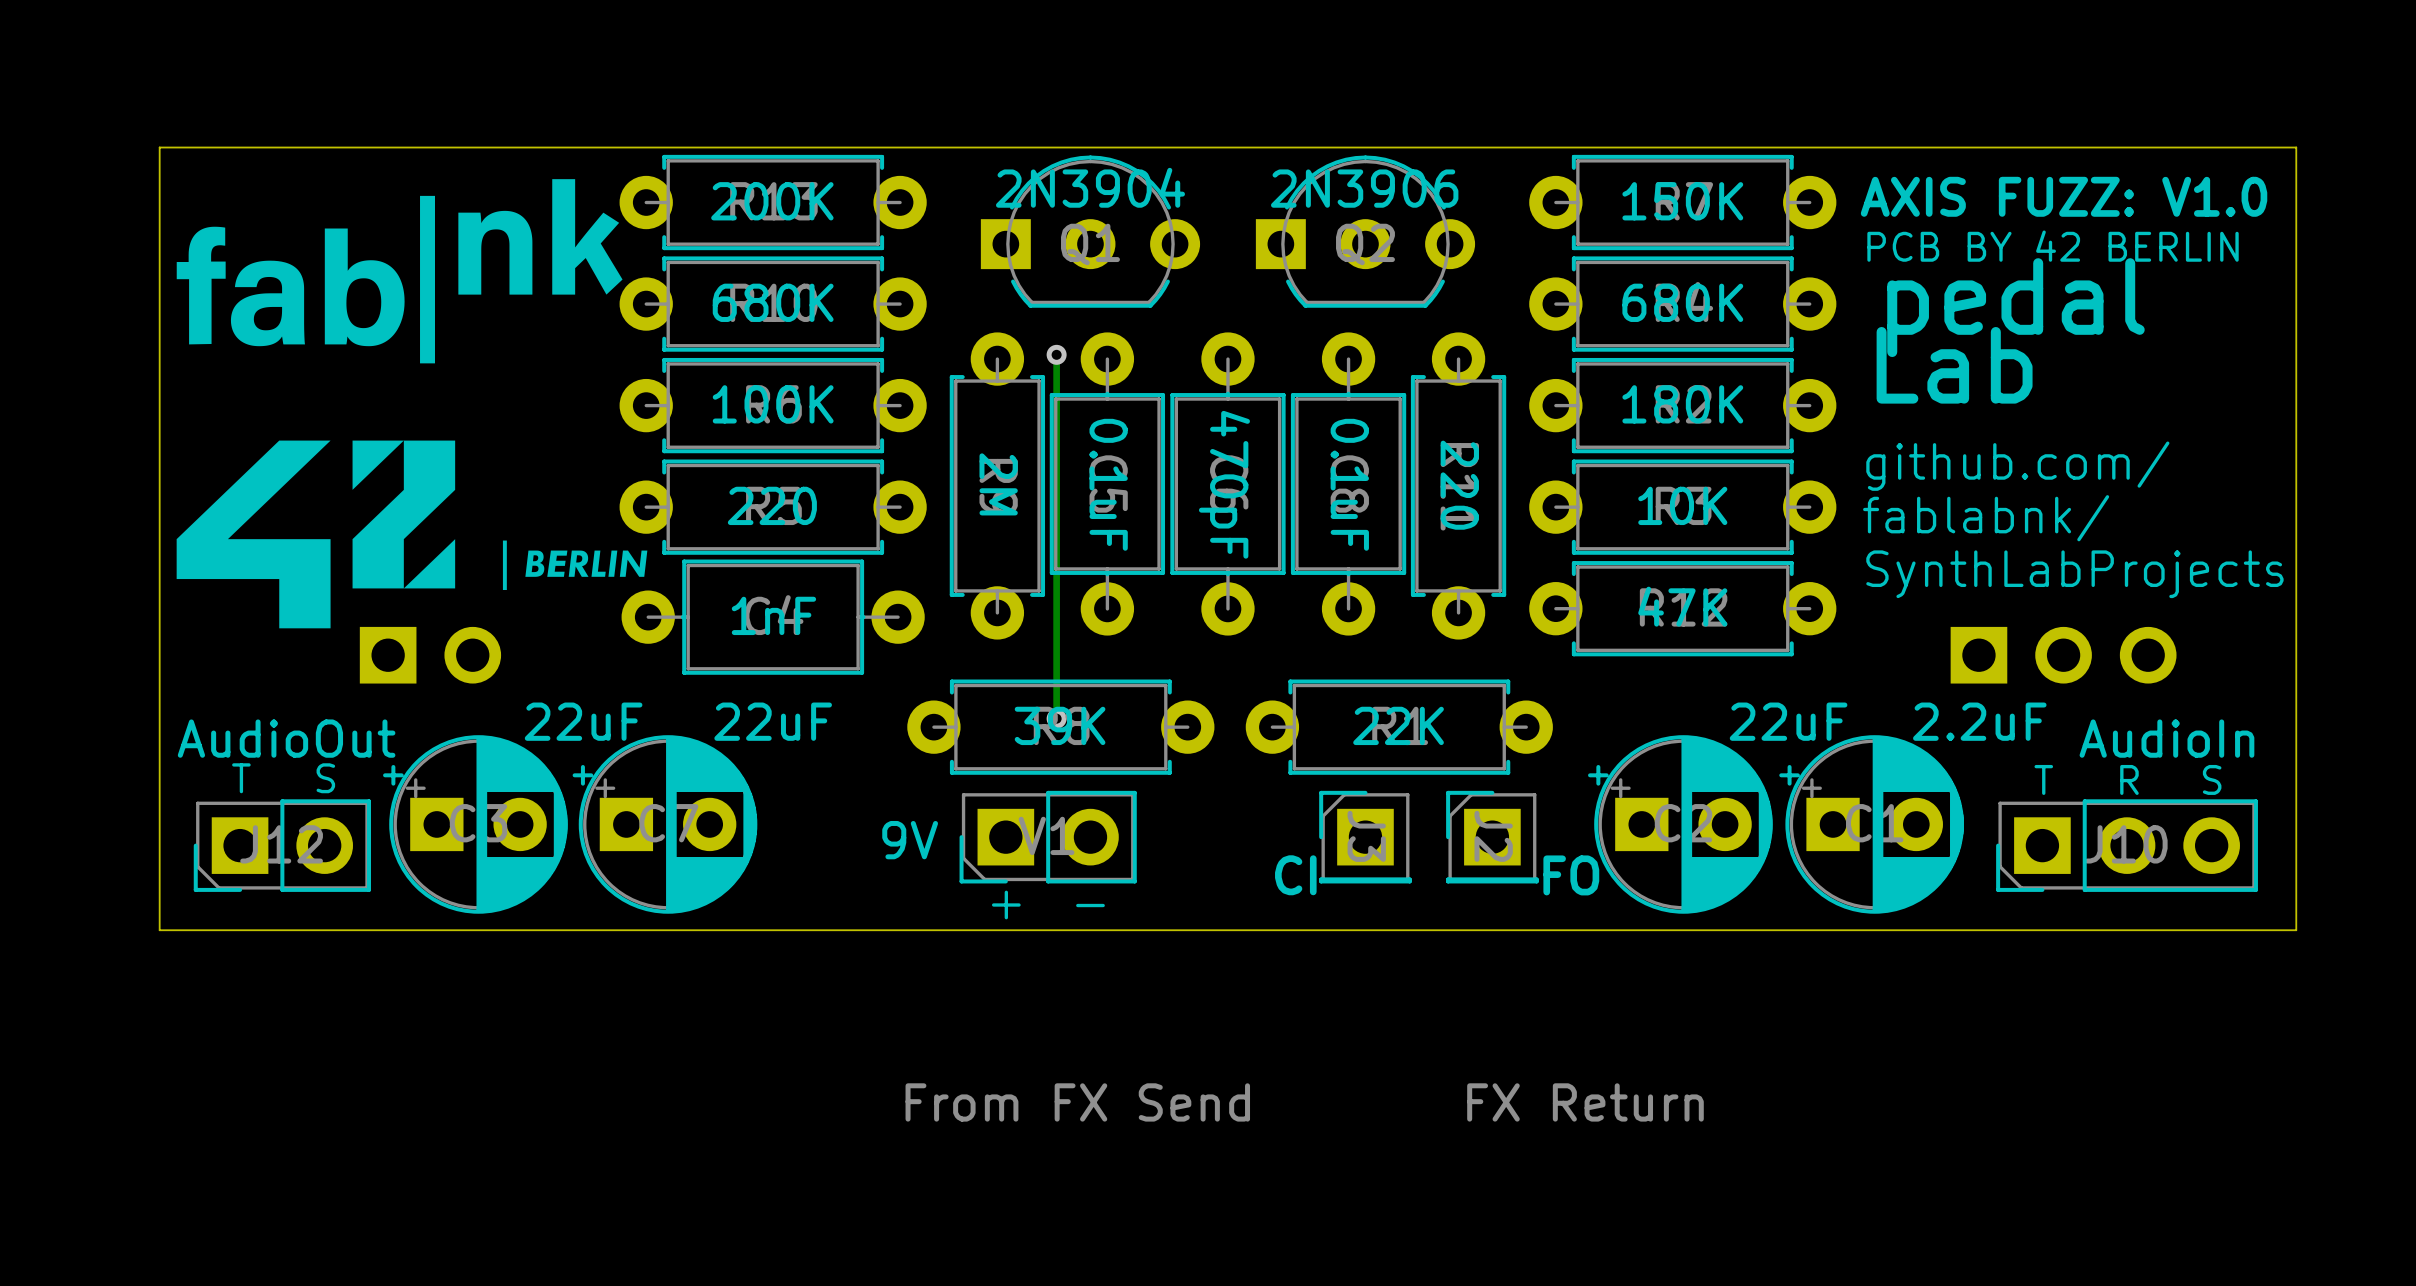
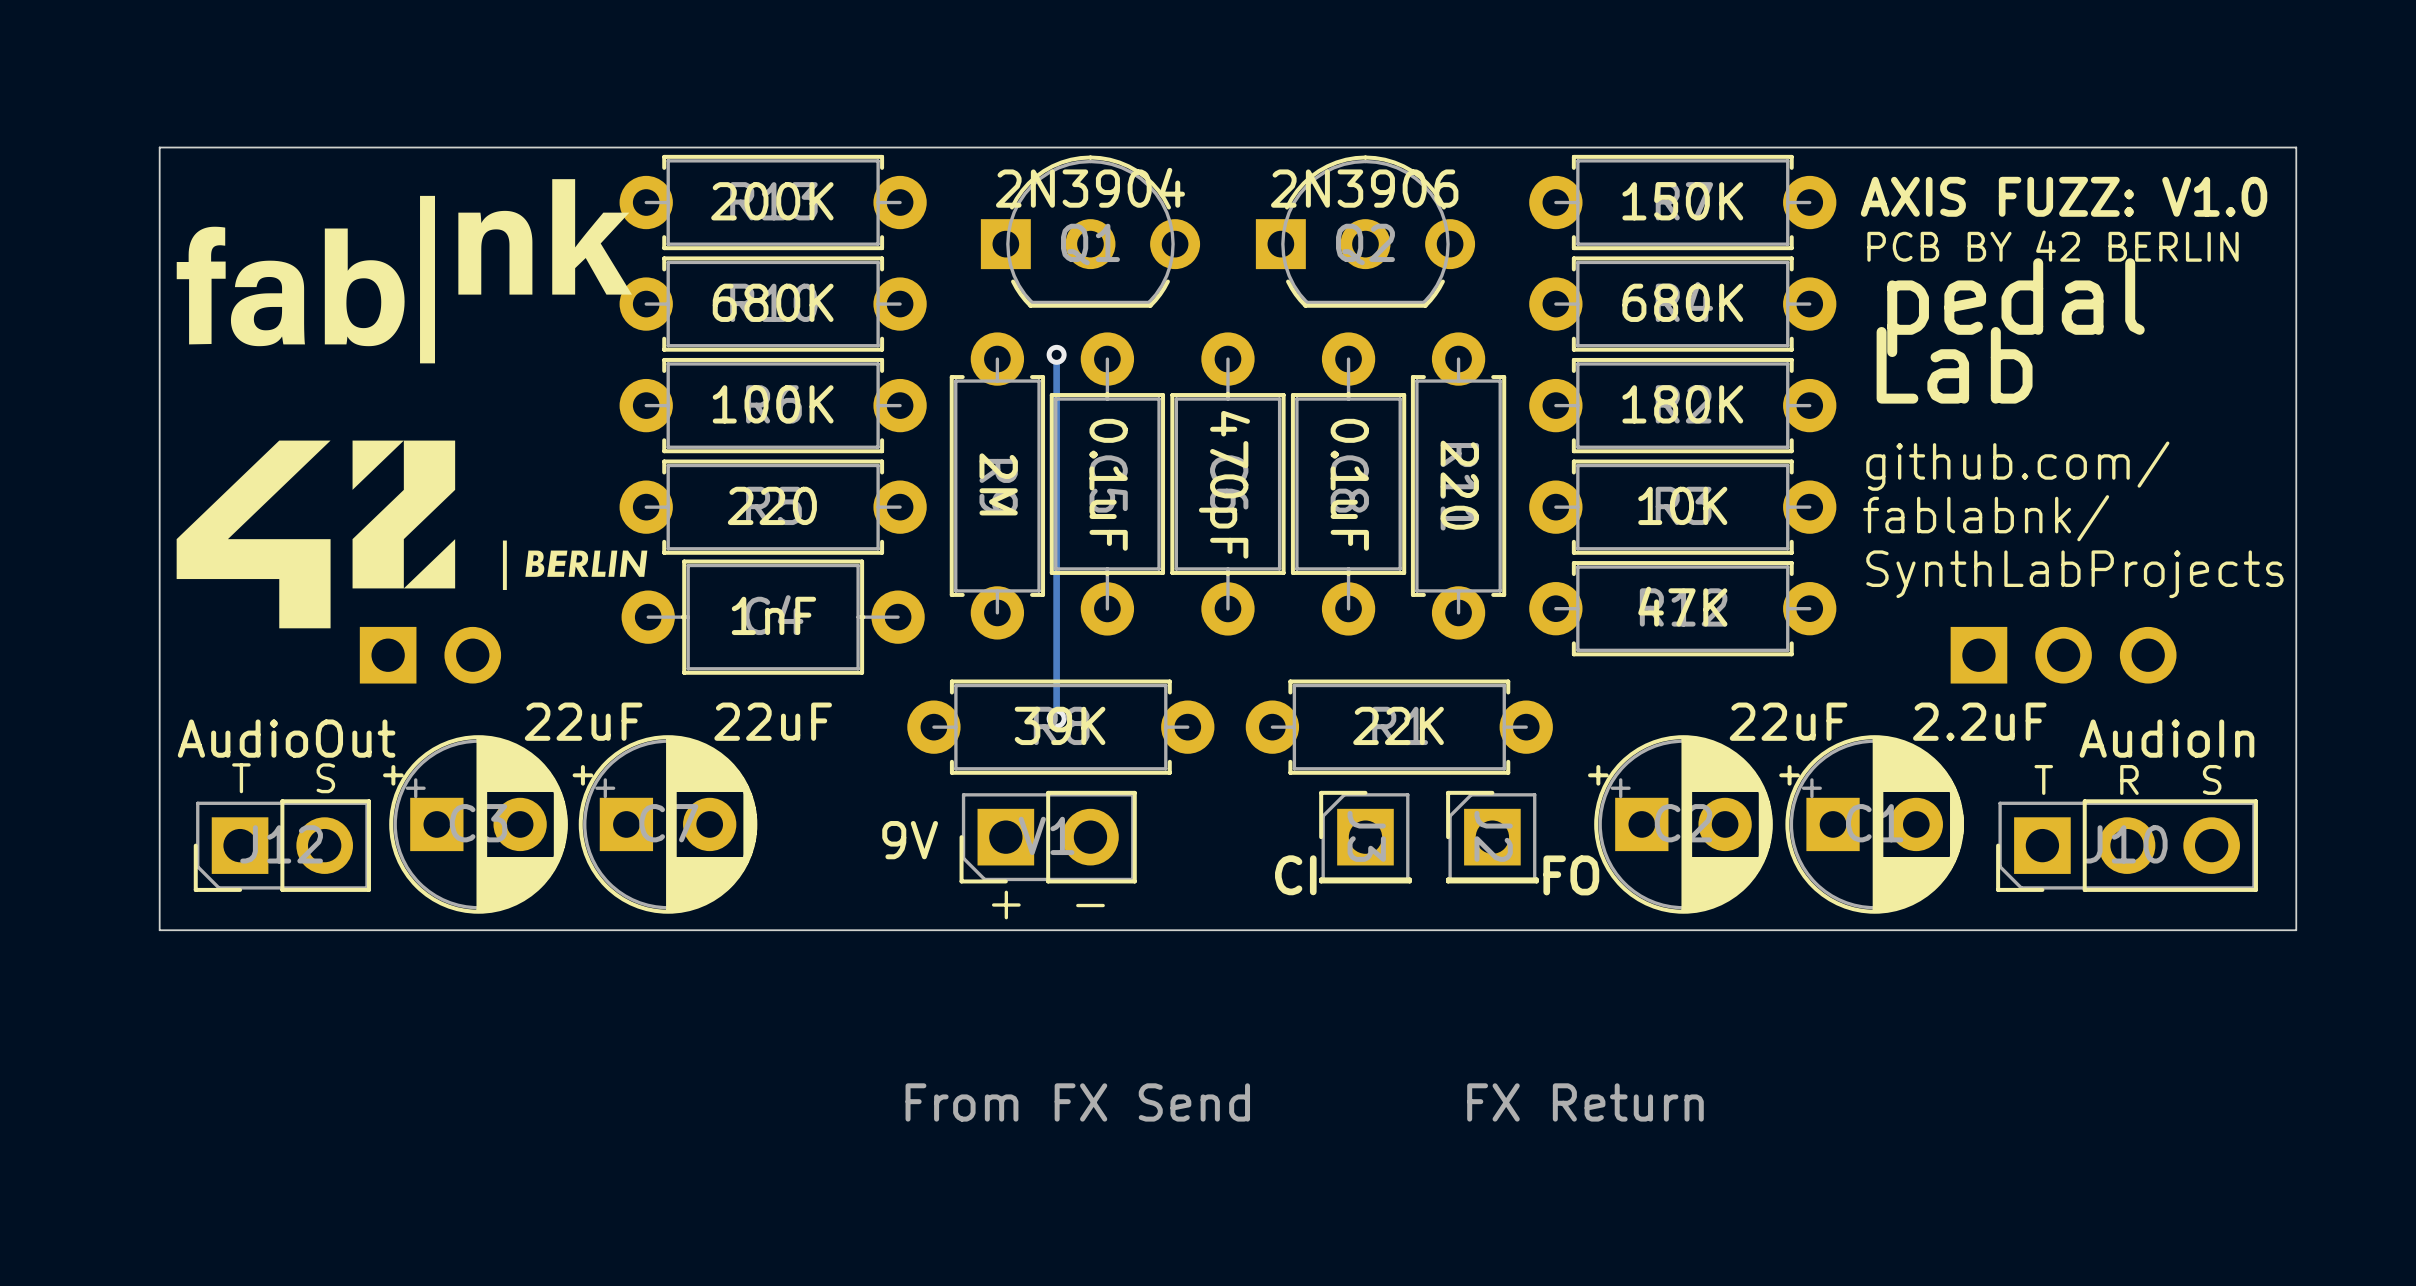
drawing shape: [552, 179, 623, 295] -> [552, 179, 633, 295]

